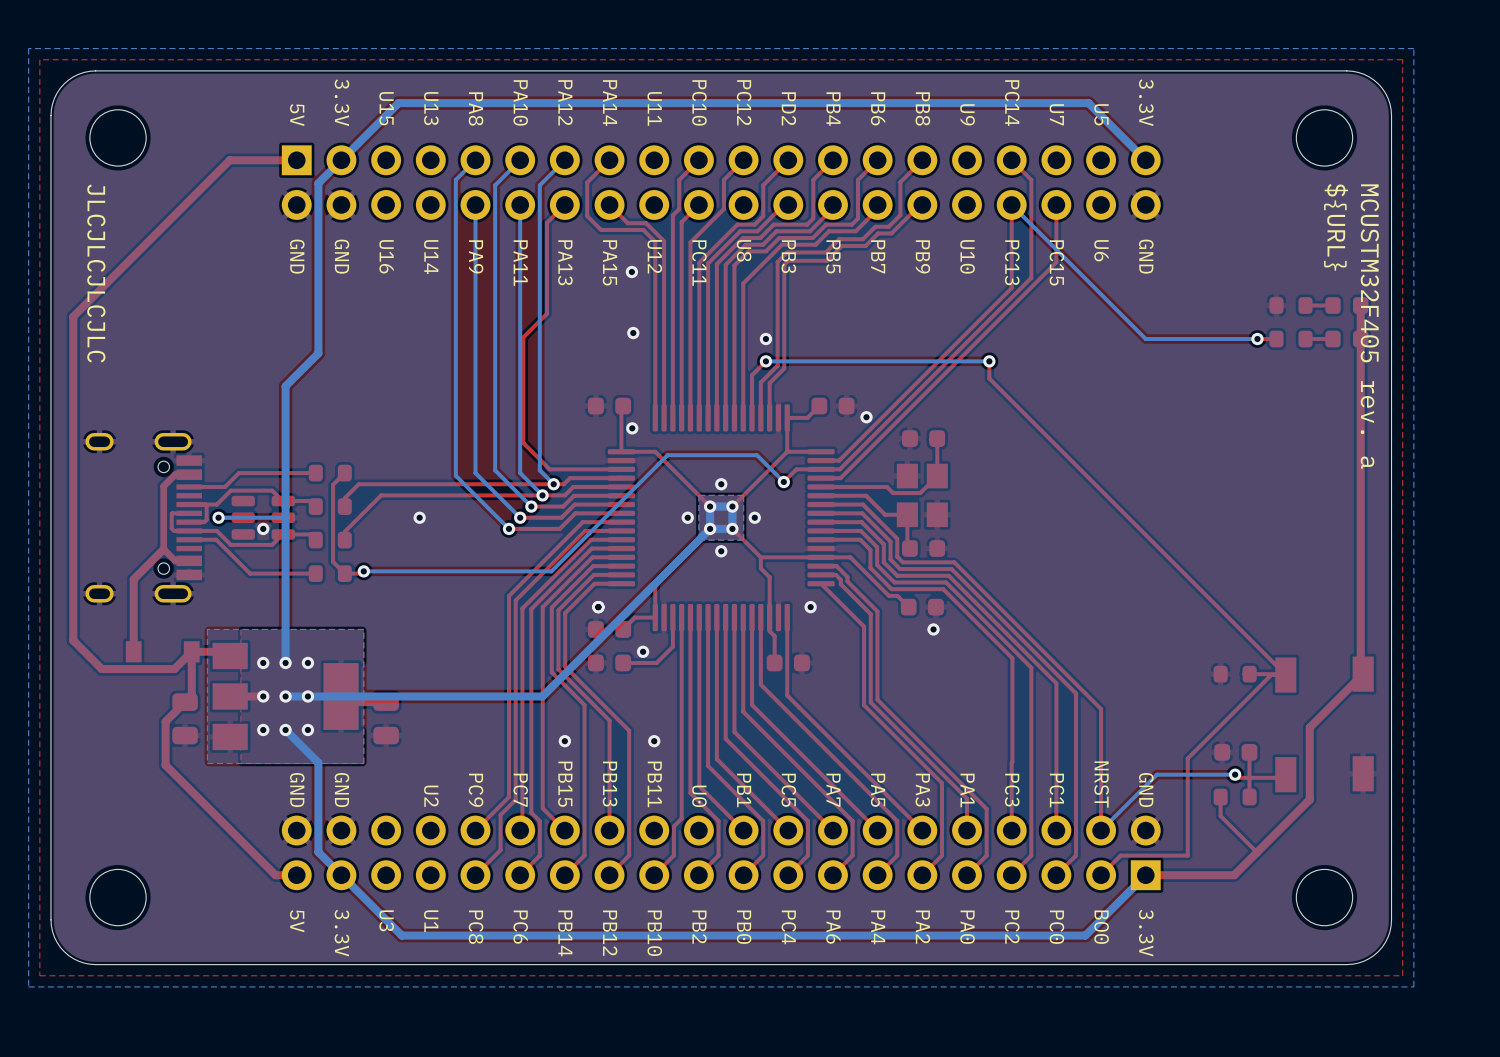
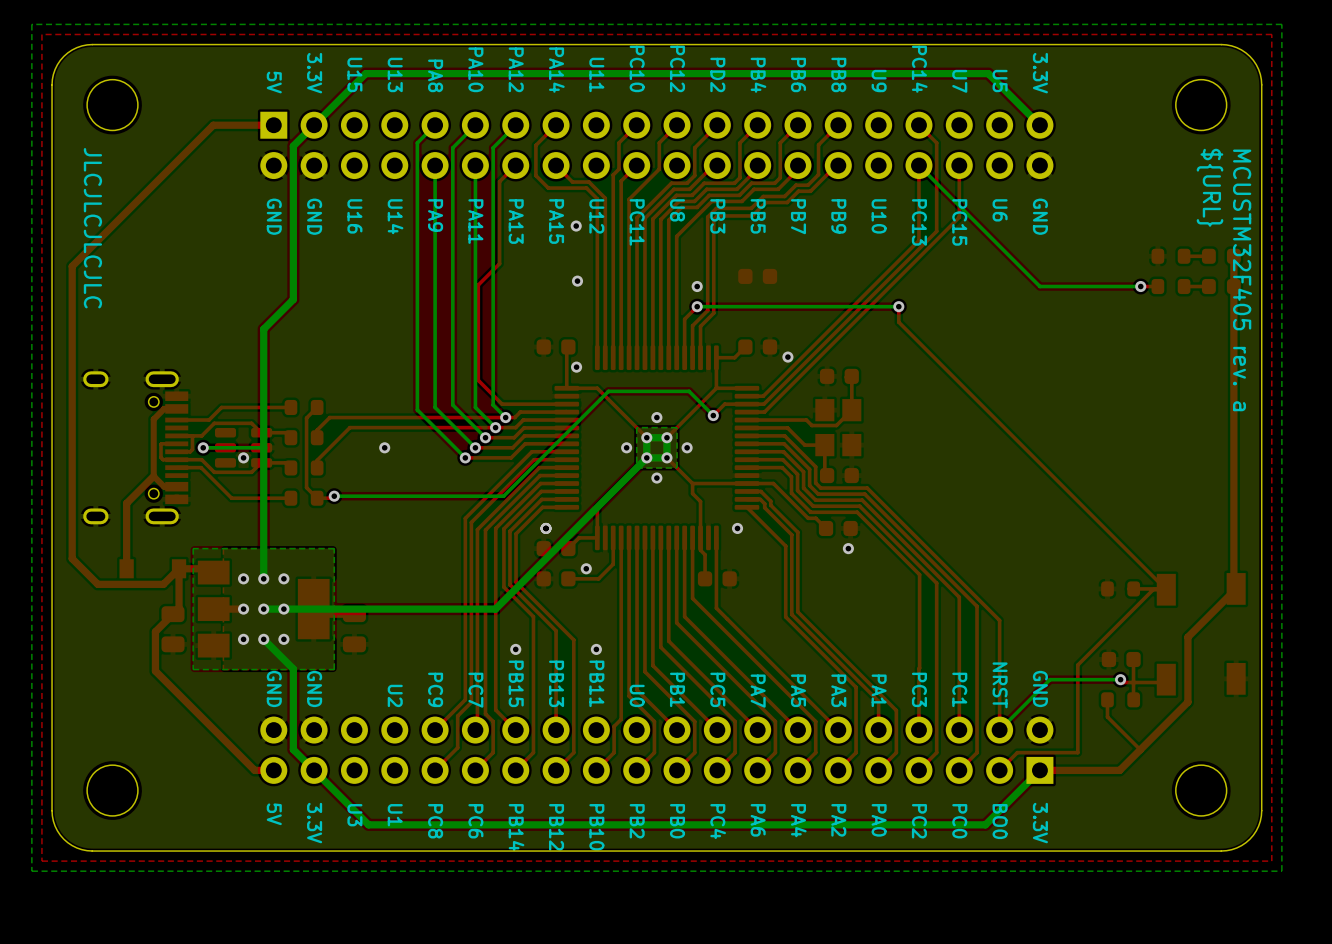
part: none -> (757, 276)

